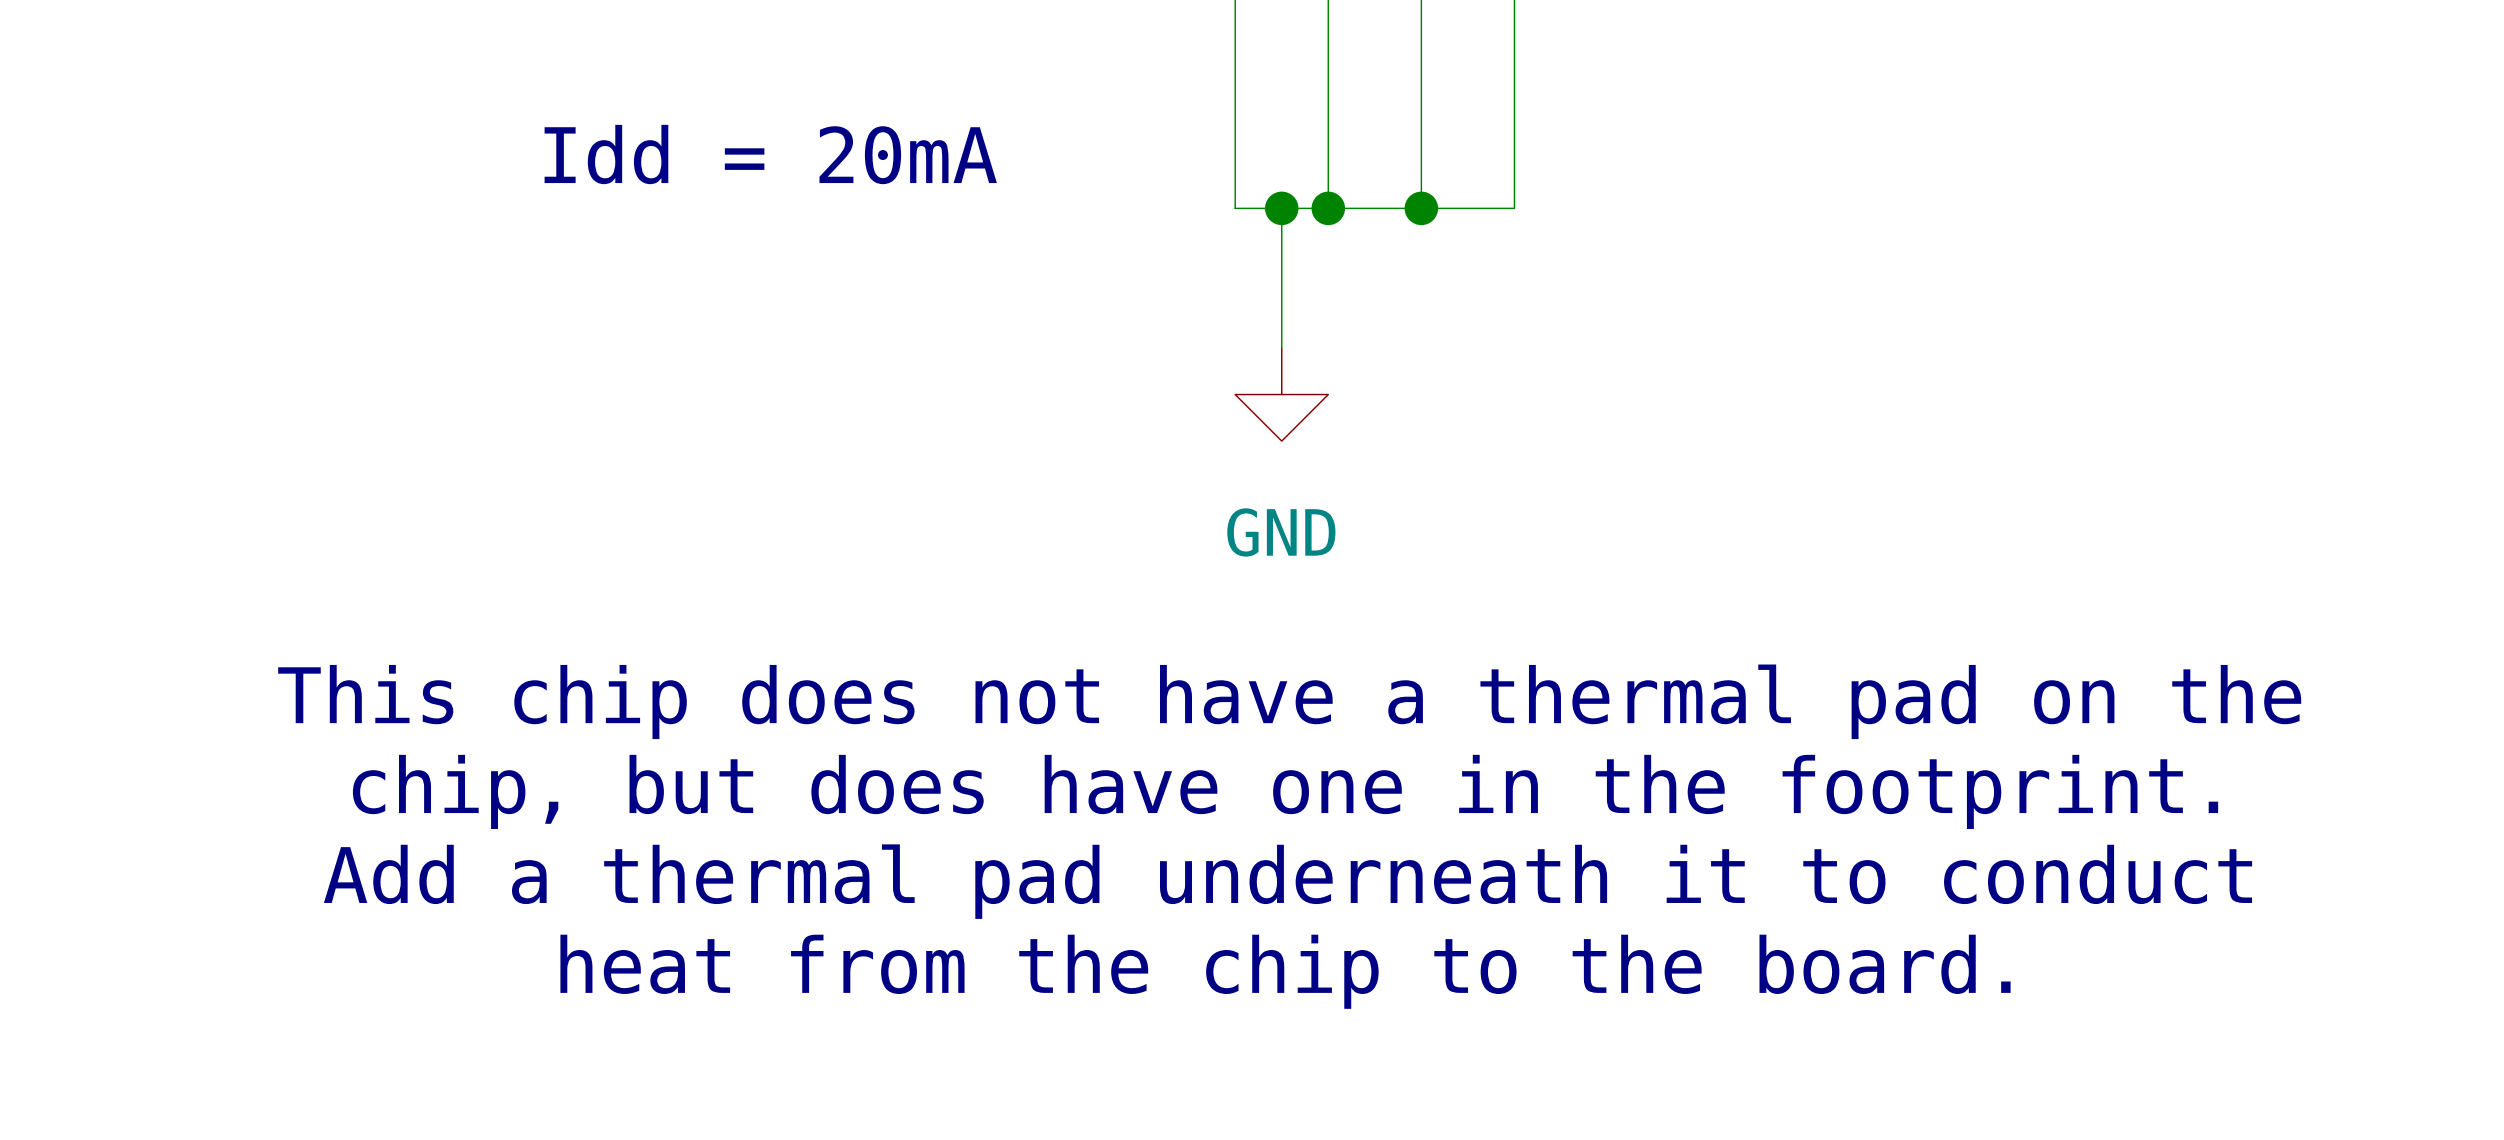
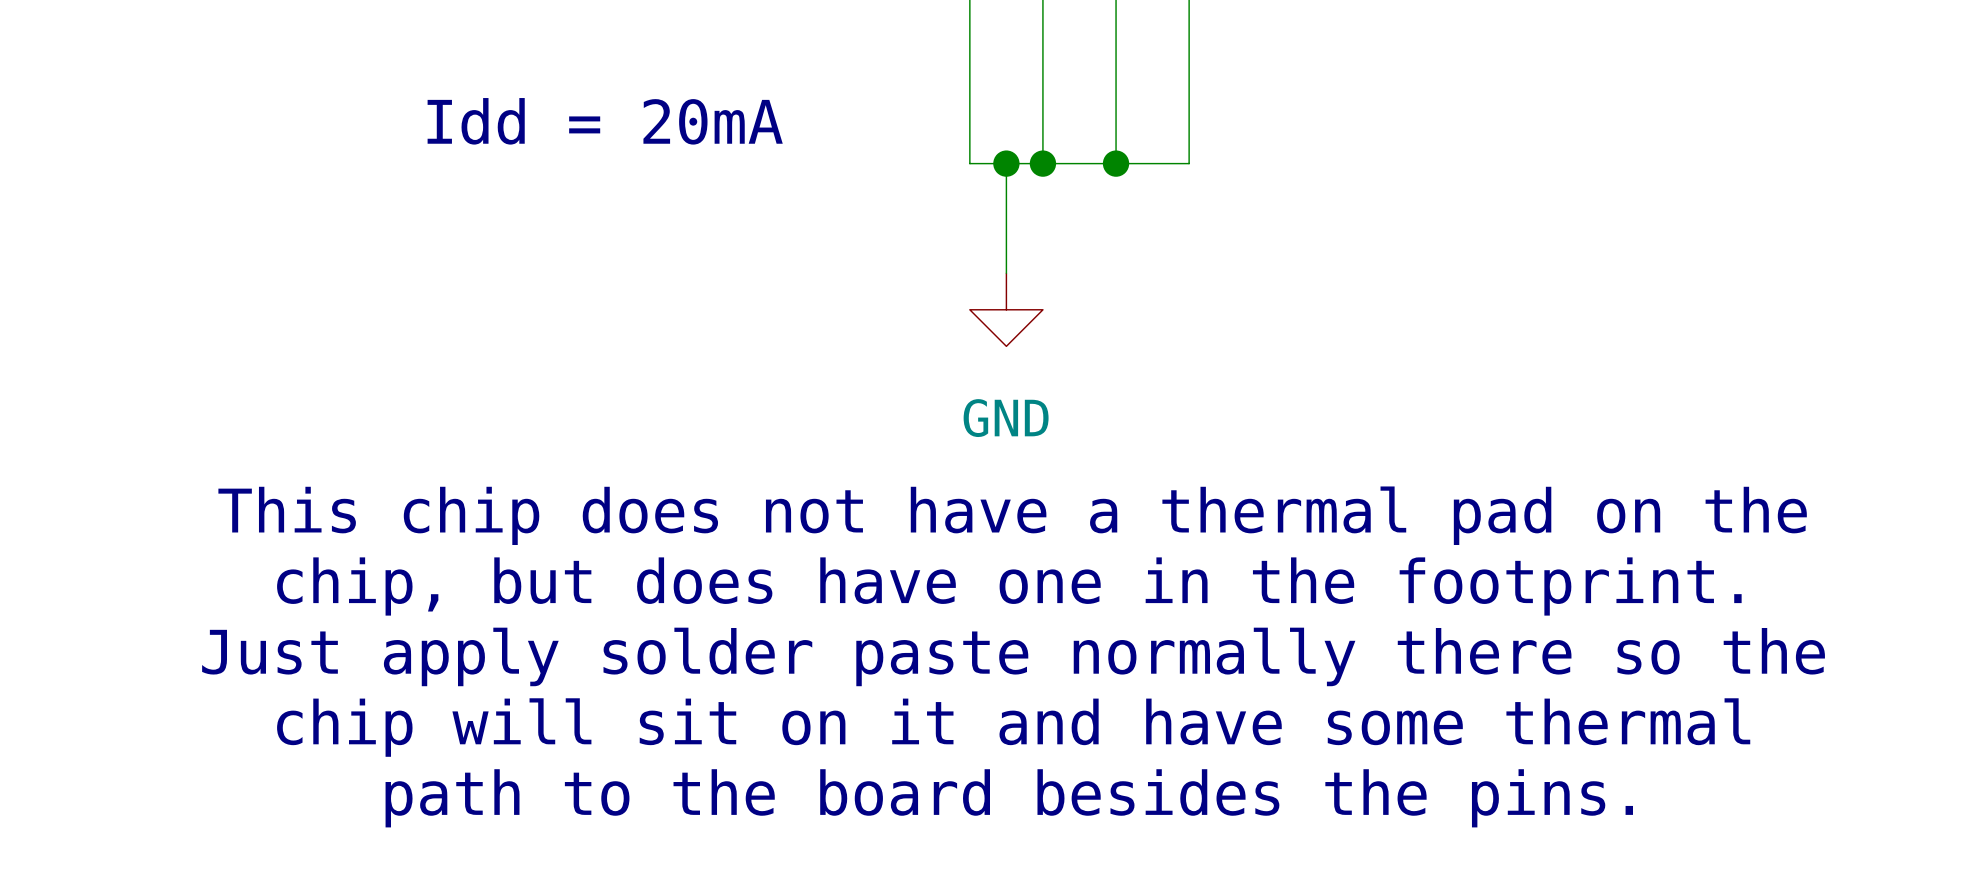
text position: This chip does not have a thermal pad on the (1289, 701) -> This chip does not have a thermal pad on the (1012, 515)
text position: chip, but does have one in the footprint. (1285, 791) -> chip, but does have one in the footprint. (1009, 586)
text: none -> Just apply solder paste normally there so the (1013, 656)
text: Add a thermal pad underneath it to conduct (1287, 881) -> none
text: none -> chip will sit on it and have some thermal (1013, 727)
text: heat from the chip to the board. (1285, 971) -> none
text: none -> path to the board besides the pins. (1009, 798)

